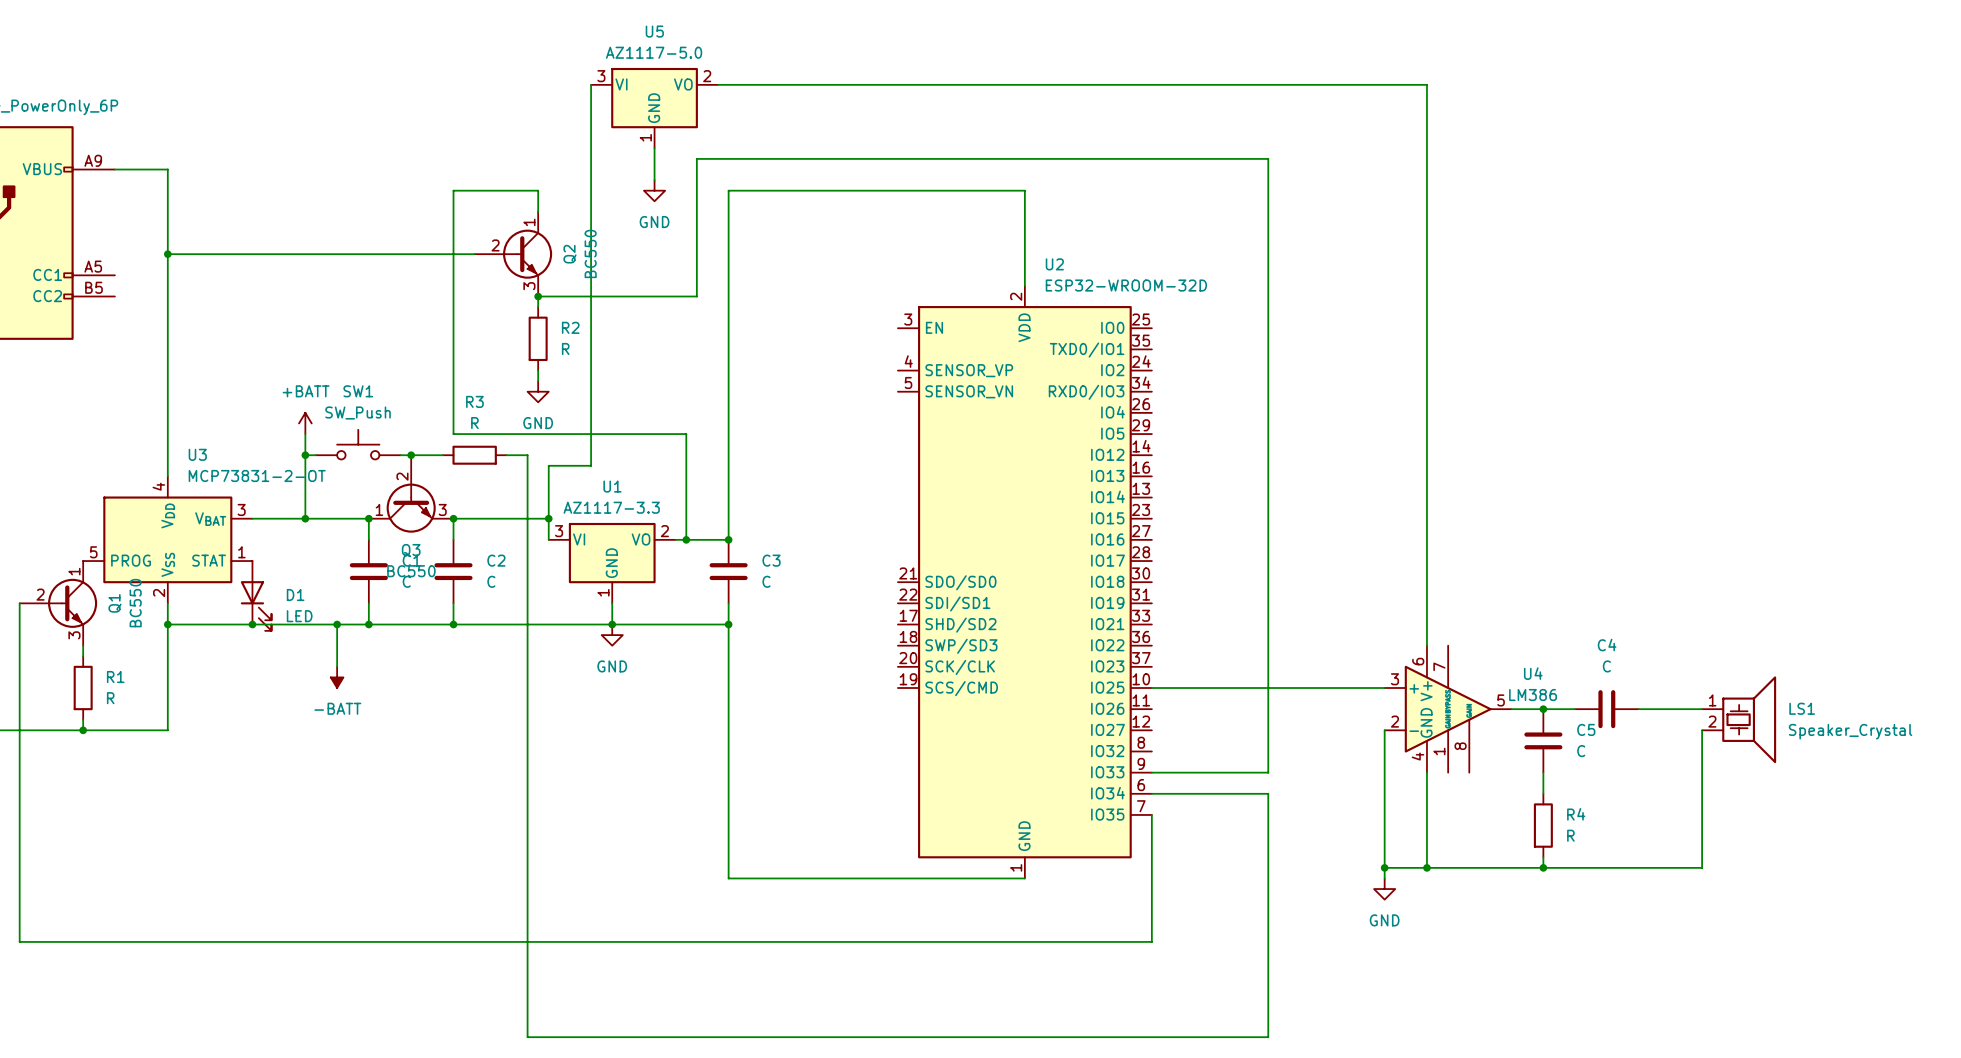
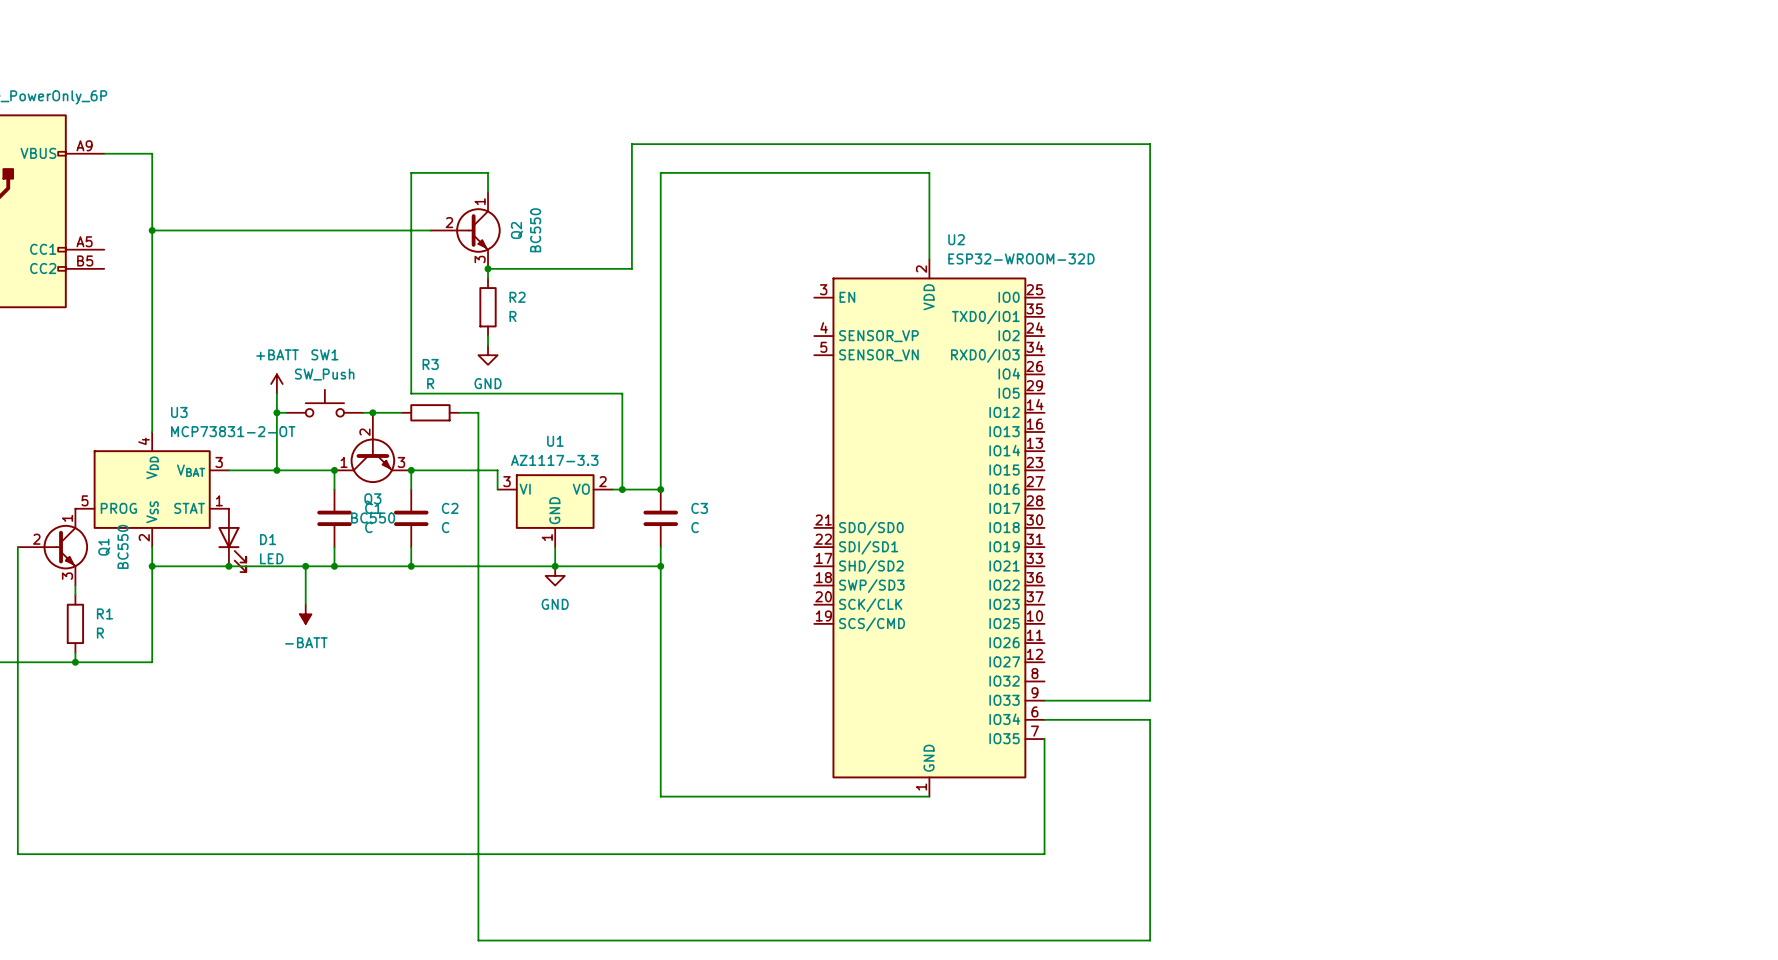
wire: (591, 84) (591, 465) (548, 465) (548, 518) -> none
wire: (718, 84) (1426, 84) (1426, 645) -> none
U5: AZ1117-5.0 (654, 108) -> none
wire: (654, 148) (654, 180) -> none
power symbol: GND (654, 190) -> none
junction: (548, 518) -> none
wire: (1151, 688) (1384, 688) -> none
U4: LM386 (1448, 709) -> none
wire: (1511, 709) (1575, 709) -> none
junction: (1543, 709) -> none
C4: C (1606, 709) -> none
wire: (1638, 709) (1702, 709) -> none
LS1: Speaker_Crystal (1739, 719) -> none
wire: (1384, 730) (1384, 878) -> none
wire: (1702, 730) (1702, 867) (1384, 867) -> none
C5: C (1543, 740) -> none
wire: (1426, 772) (1426, 867) -> none
wire: (1543, 772) (1543, 793) -> none
R4: R (1543, 825) -> none
wire: (1543, 857) (1543, 867) -> none
junction: (1384, 867) -> none
junction: (1426, 867) -> none
junction: (1543, 867) -> none
power symbol: GND (1384, 889) -> none

